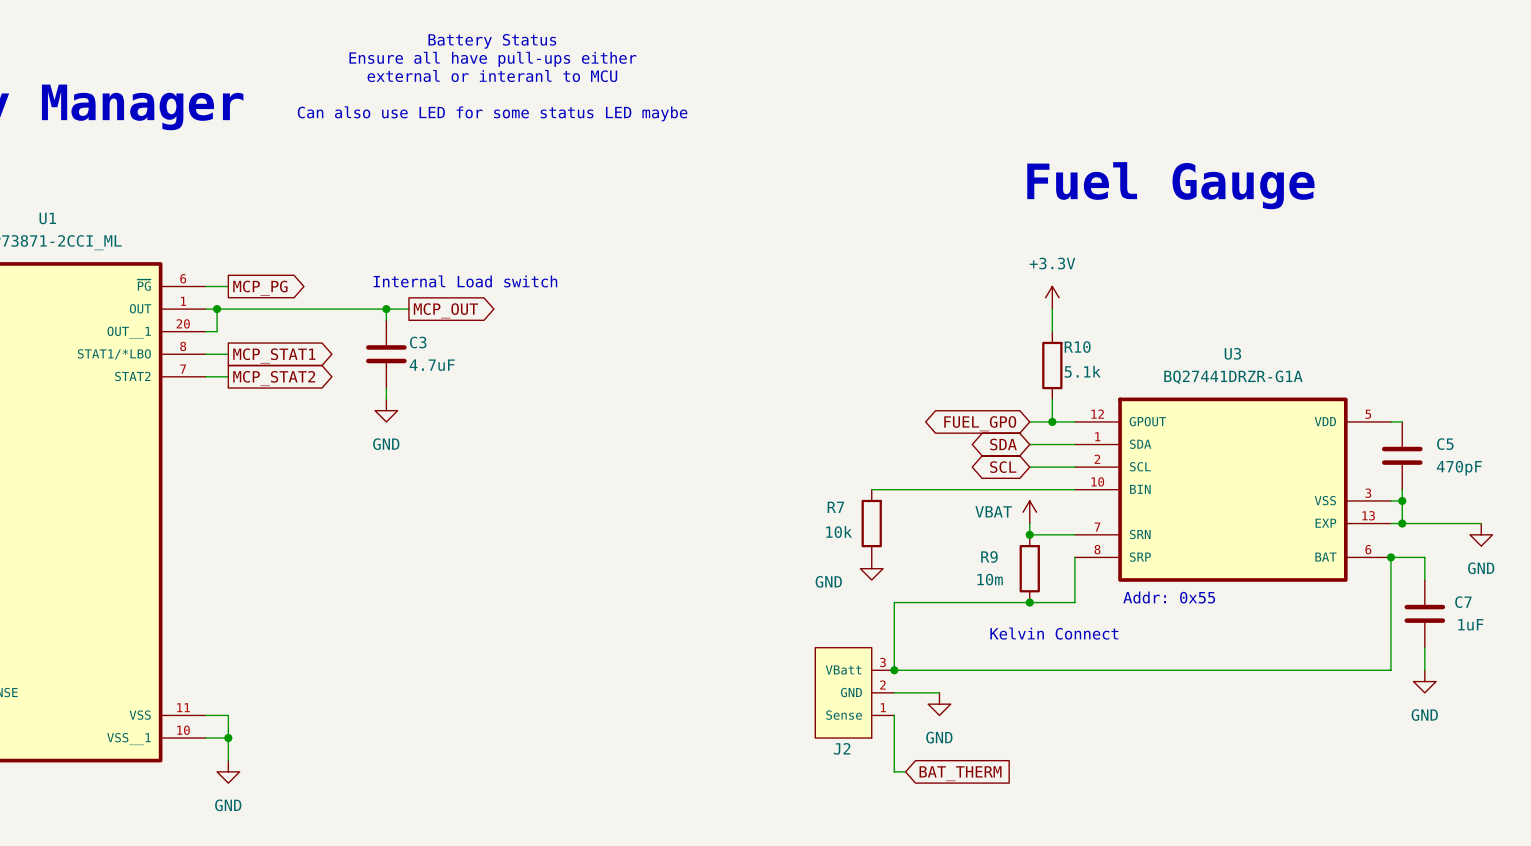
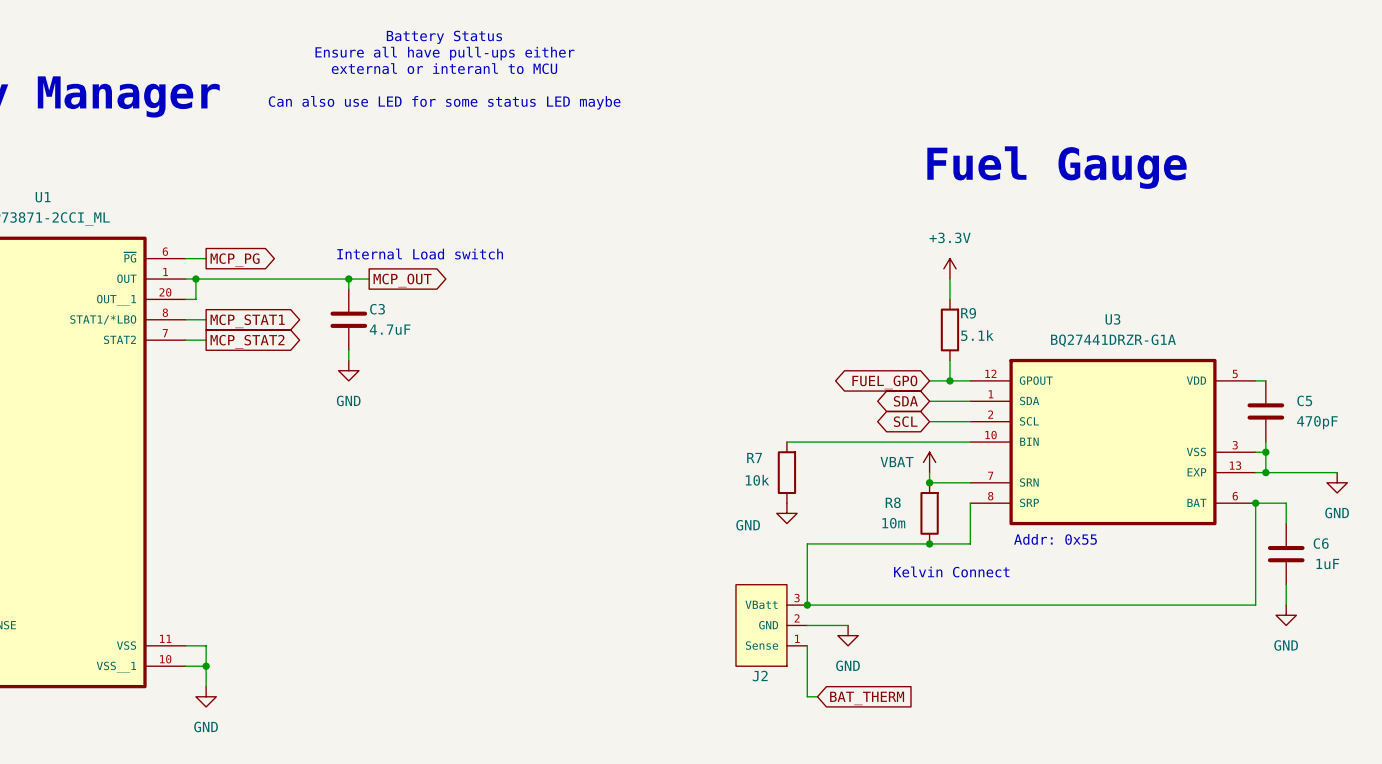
R10 name: R10 (1077, 347) -> R9 (968, 313)
R9 name: R9 (989, 556) -> R8 (893, 502)
C7 name: C7 (1463, 602) -> C6 (1321, 543)

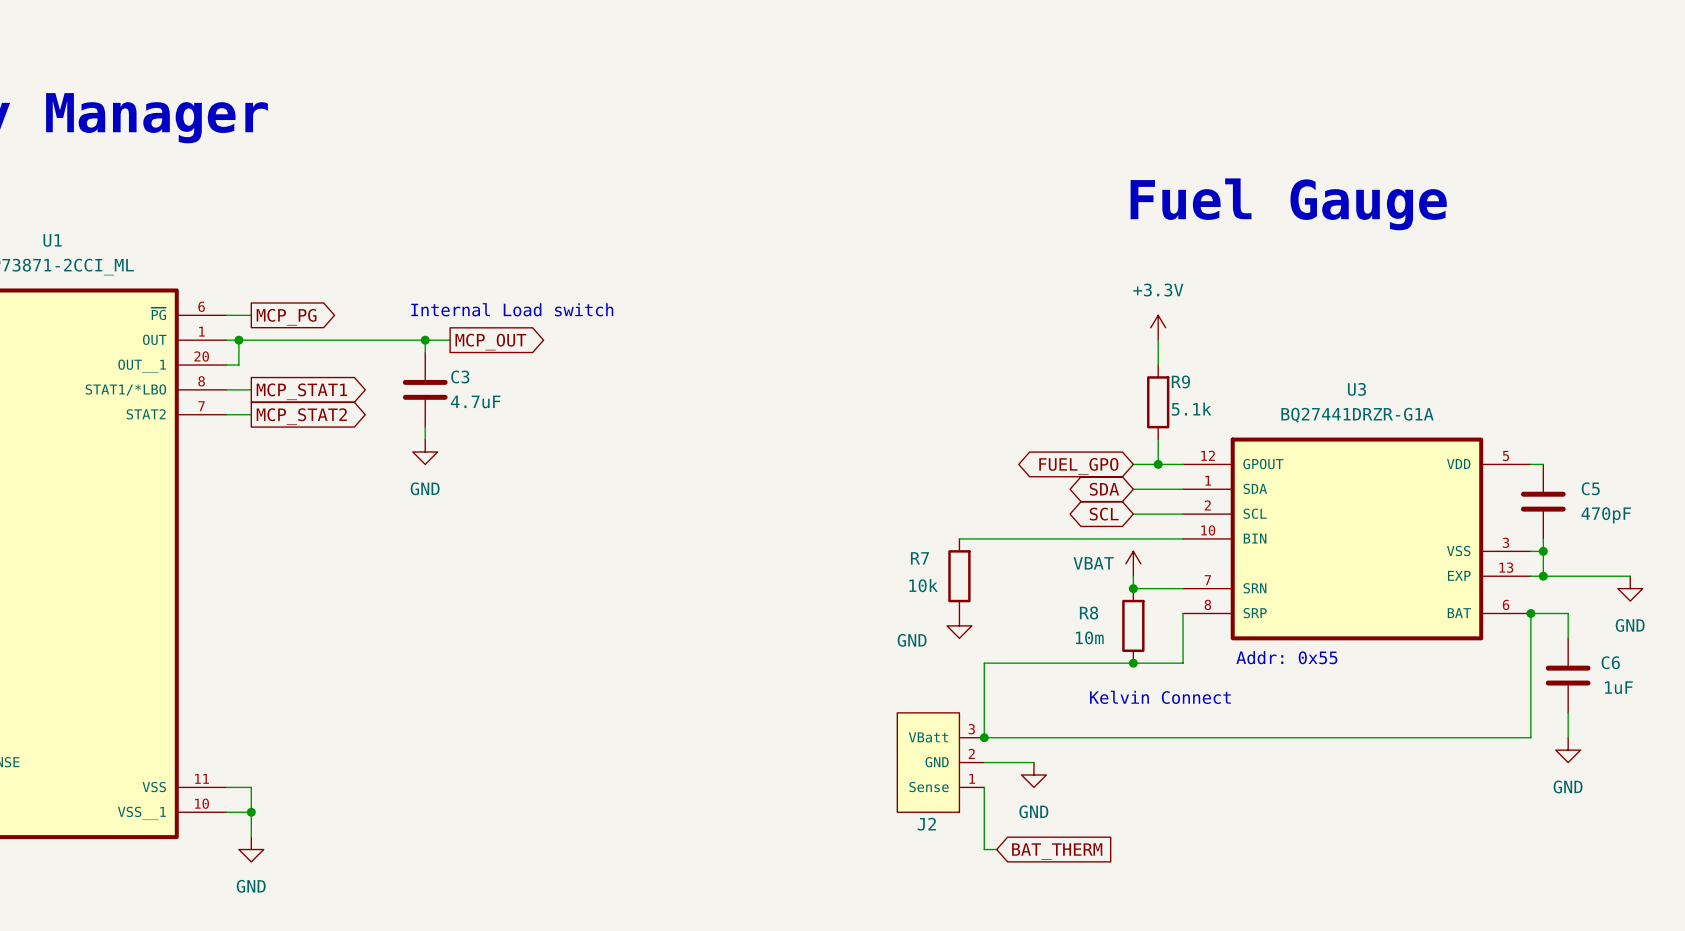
text: Battery Status (444, 37) -> none
text: Ensure all have pull-ups either (444, 53) -> none
text: external or interanl to MCU (444, 68) -> none
text: Can also use LED for some status LED maybe (444, 102) -> none

